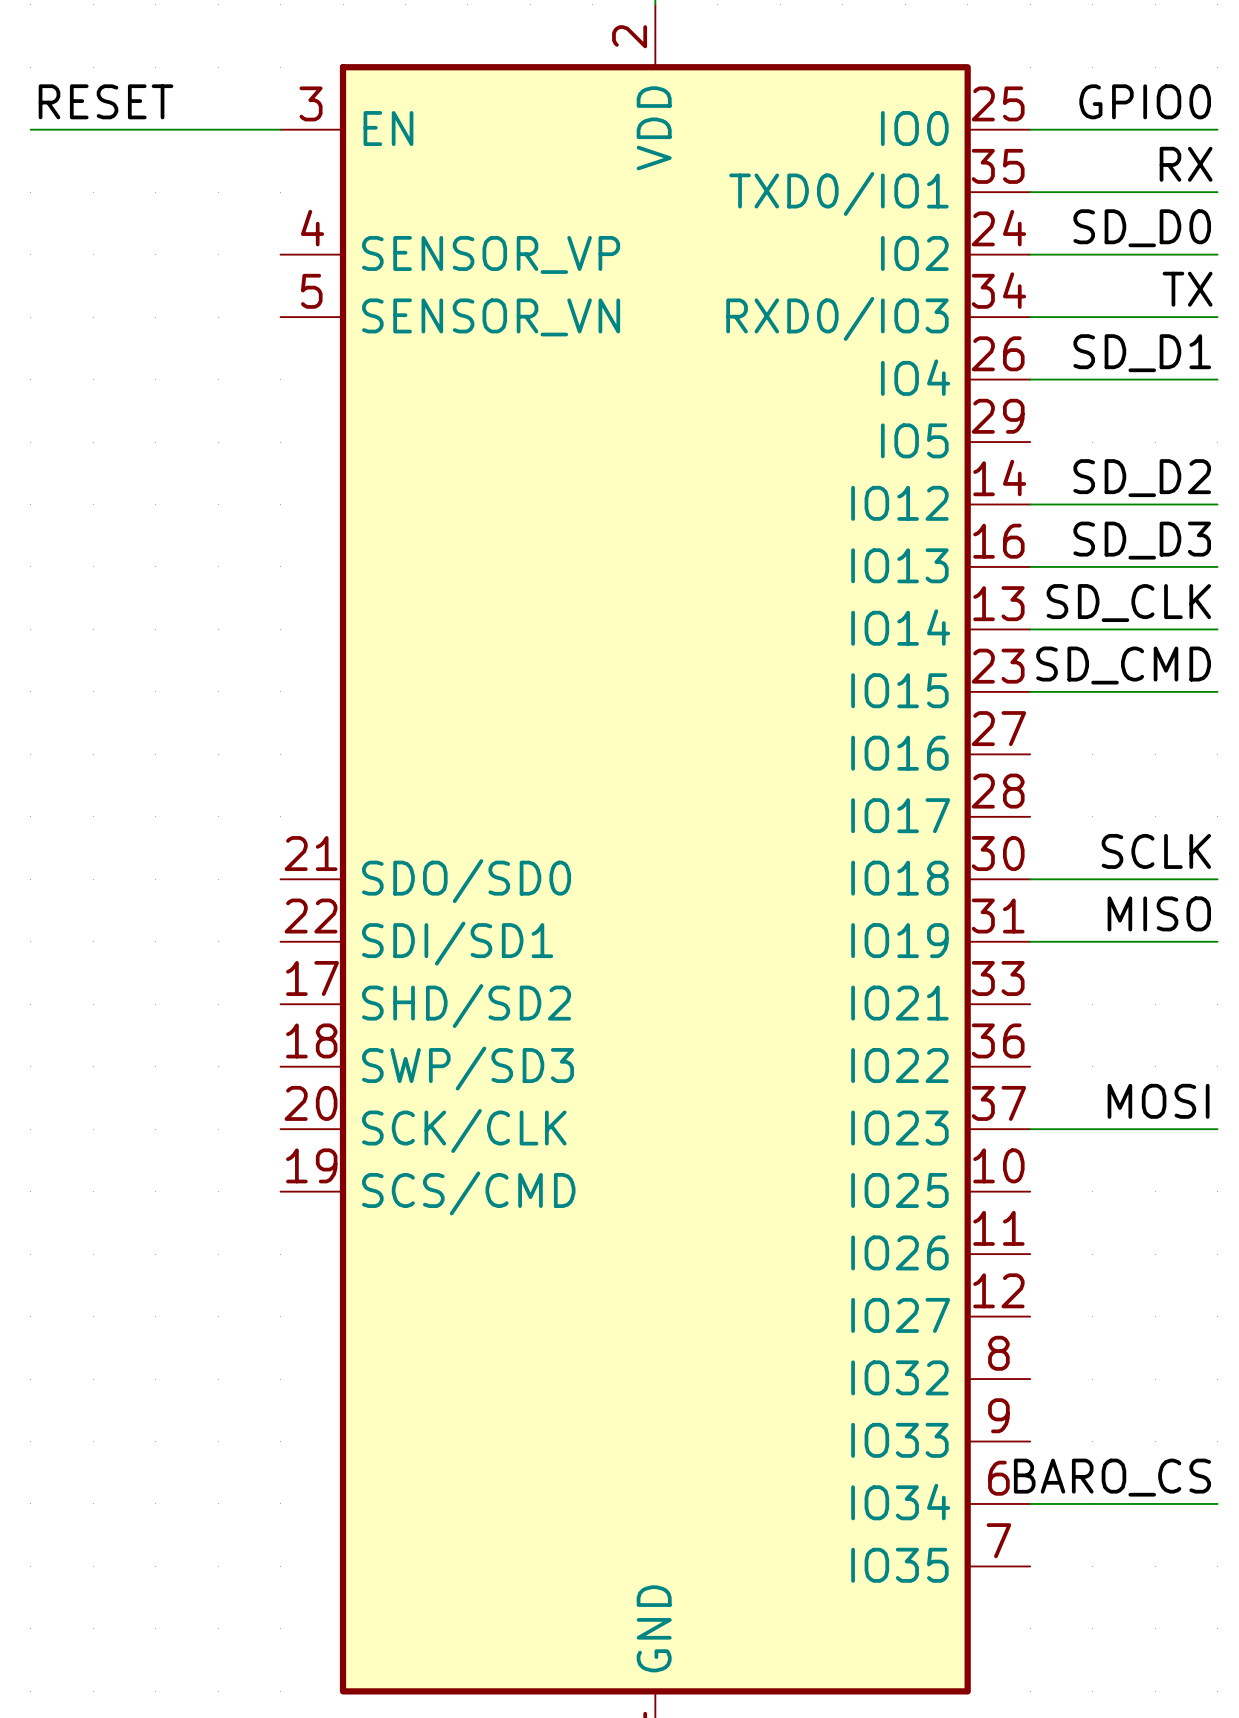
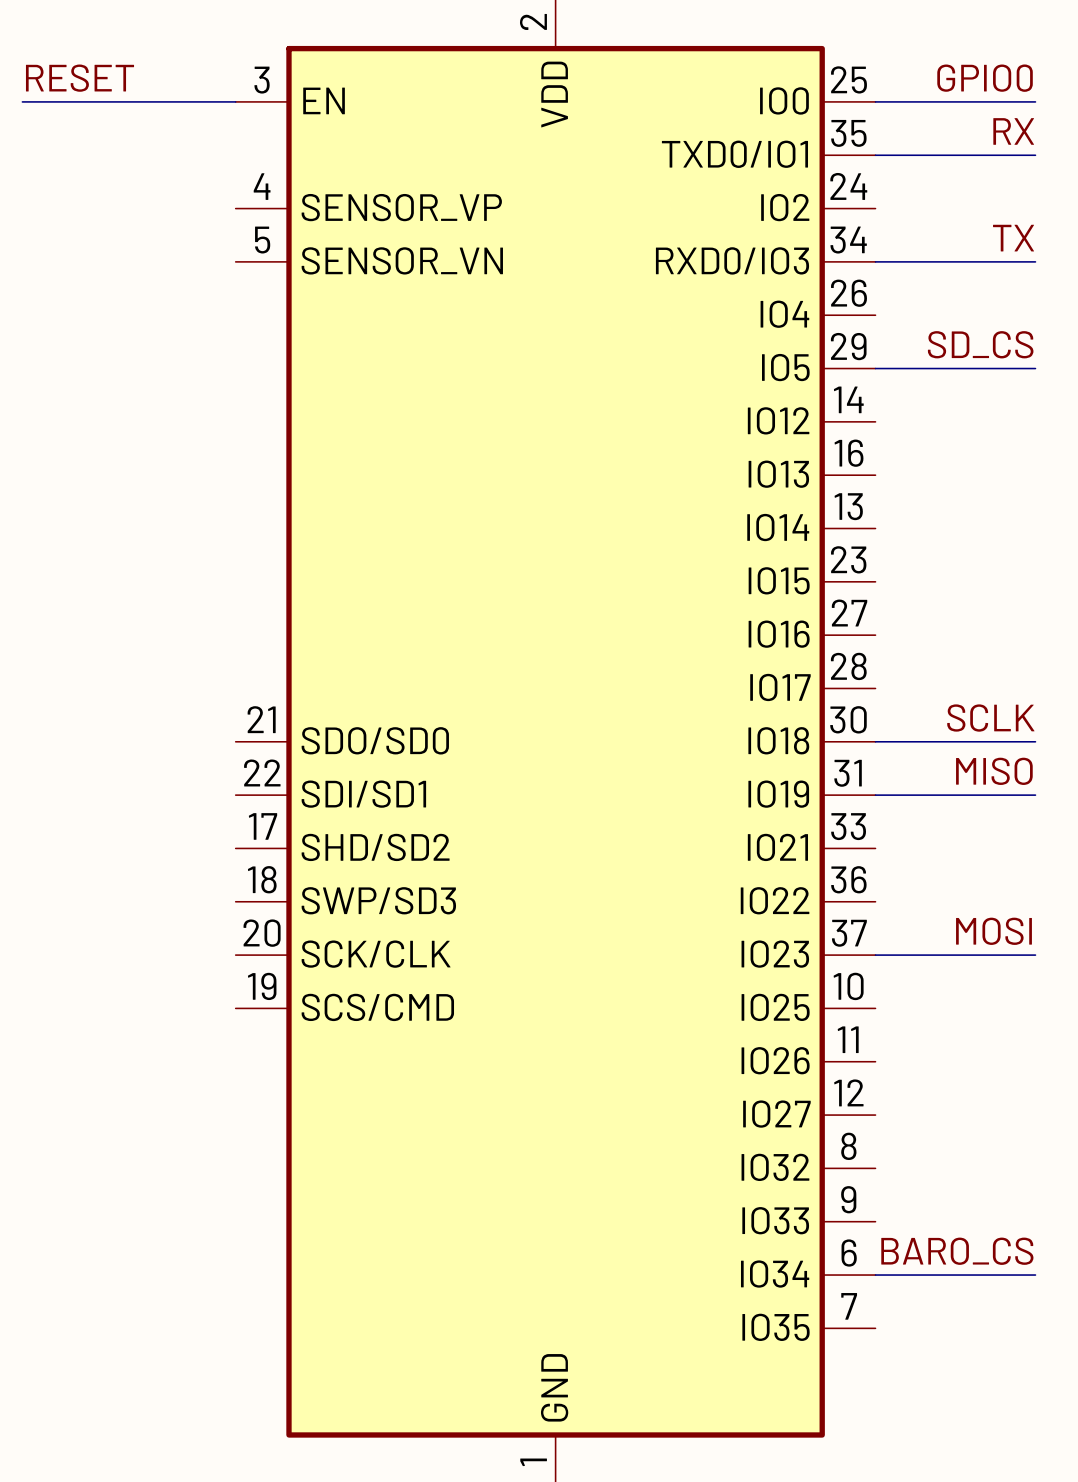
label: SD_D0 (1142, 228) -> none
wire: (1030, 254) (1217, 254) -> none
label: SD_D1 (1142, 353) -> none
wire: (1030, 379) (1217, 379) -> (875, 368) (1035, 368)
label: none -> SD_CS (980, 344)
label: SD_D2 (1142, 478) -> none
wire: (1030, 504) (1217, 504) -> none
label: SD_D3 (1142, 540) -> none
wire: (1030, 566) (1217, 566) -> none
label: SD_CLK (1128, 603) -> none
wire: (1030, 629) (1217, 629) -> none
label: SD_CMD (1123, 665) -> none
wire: (1030, 691) (1217, 691) -> none

